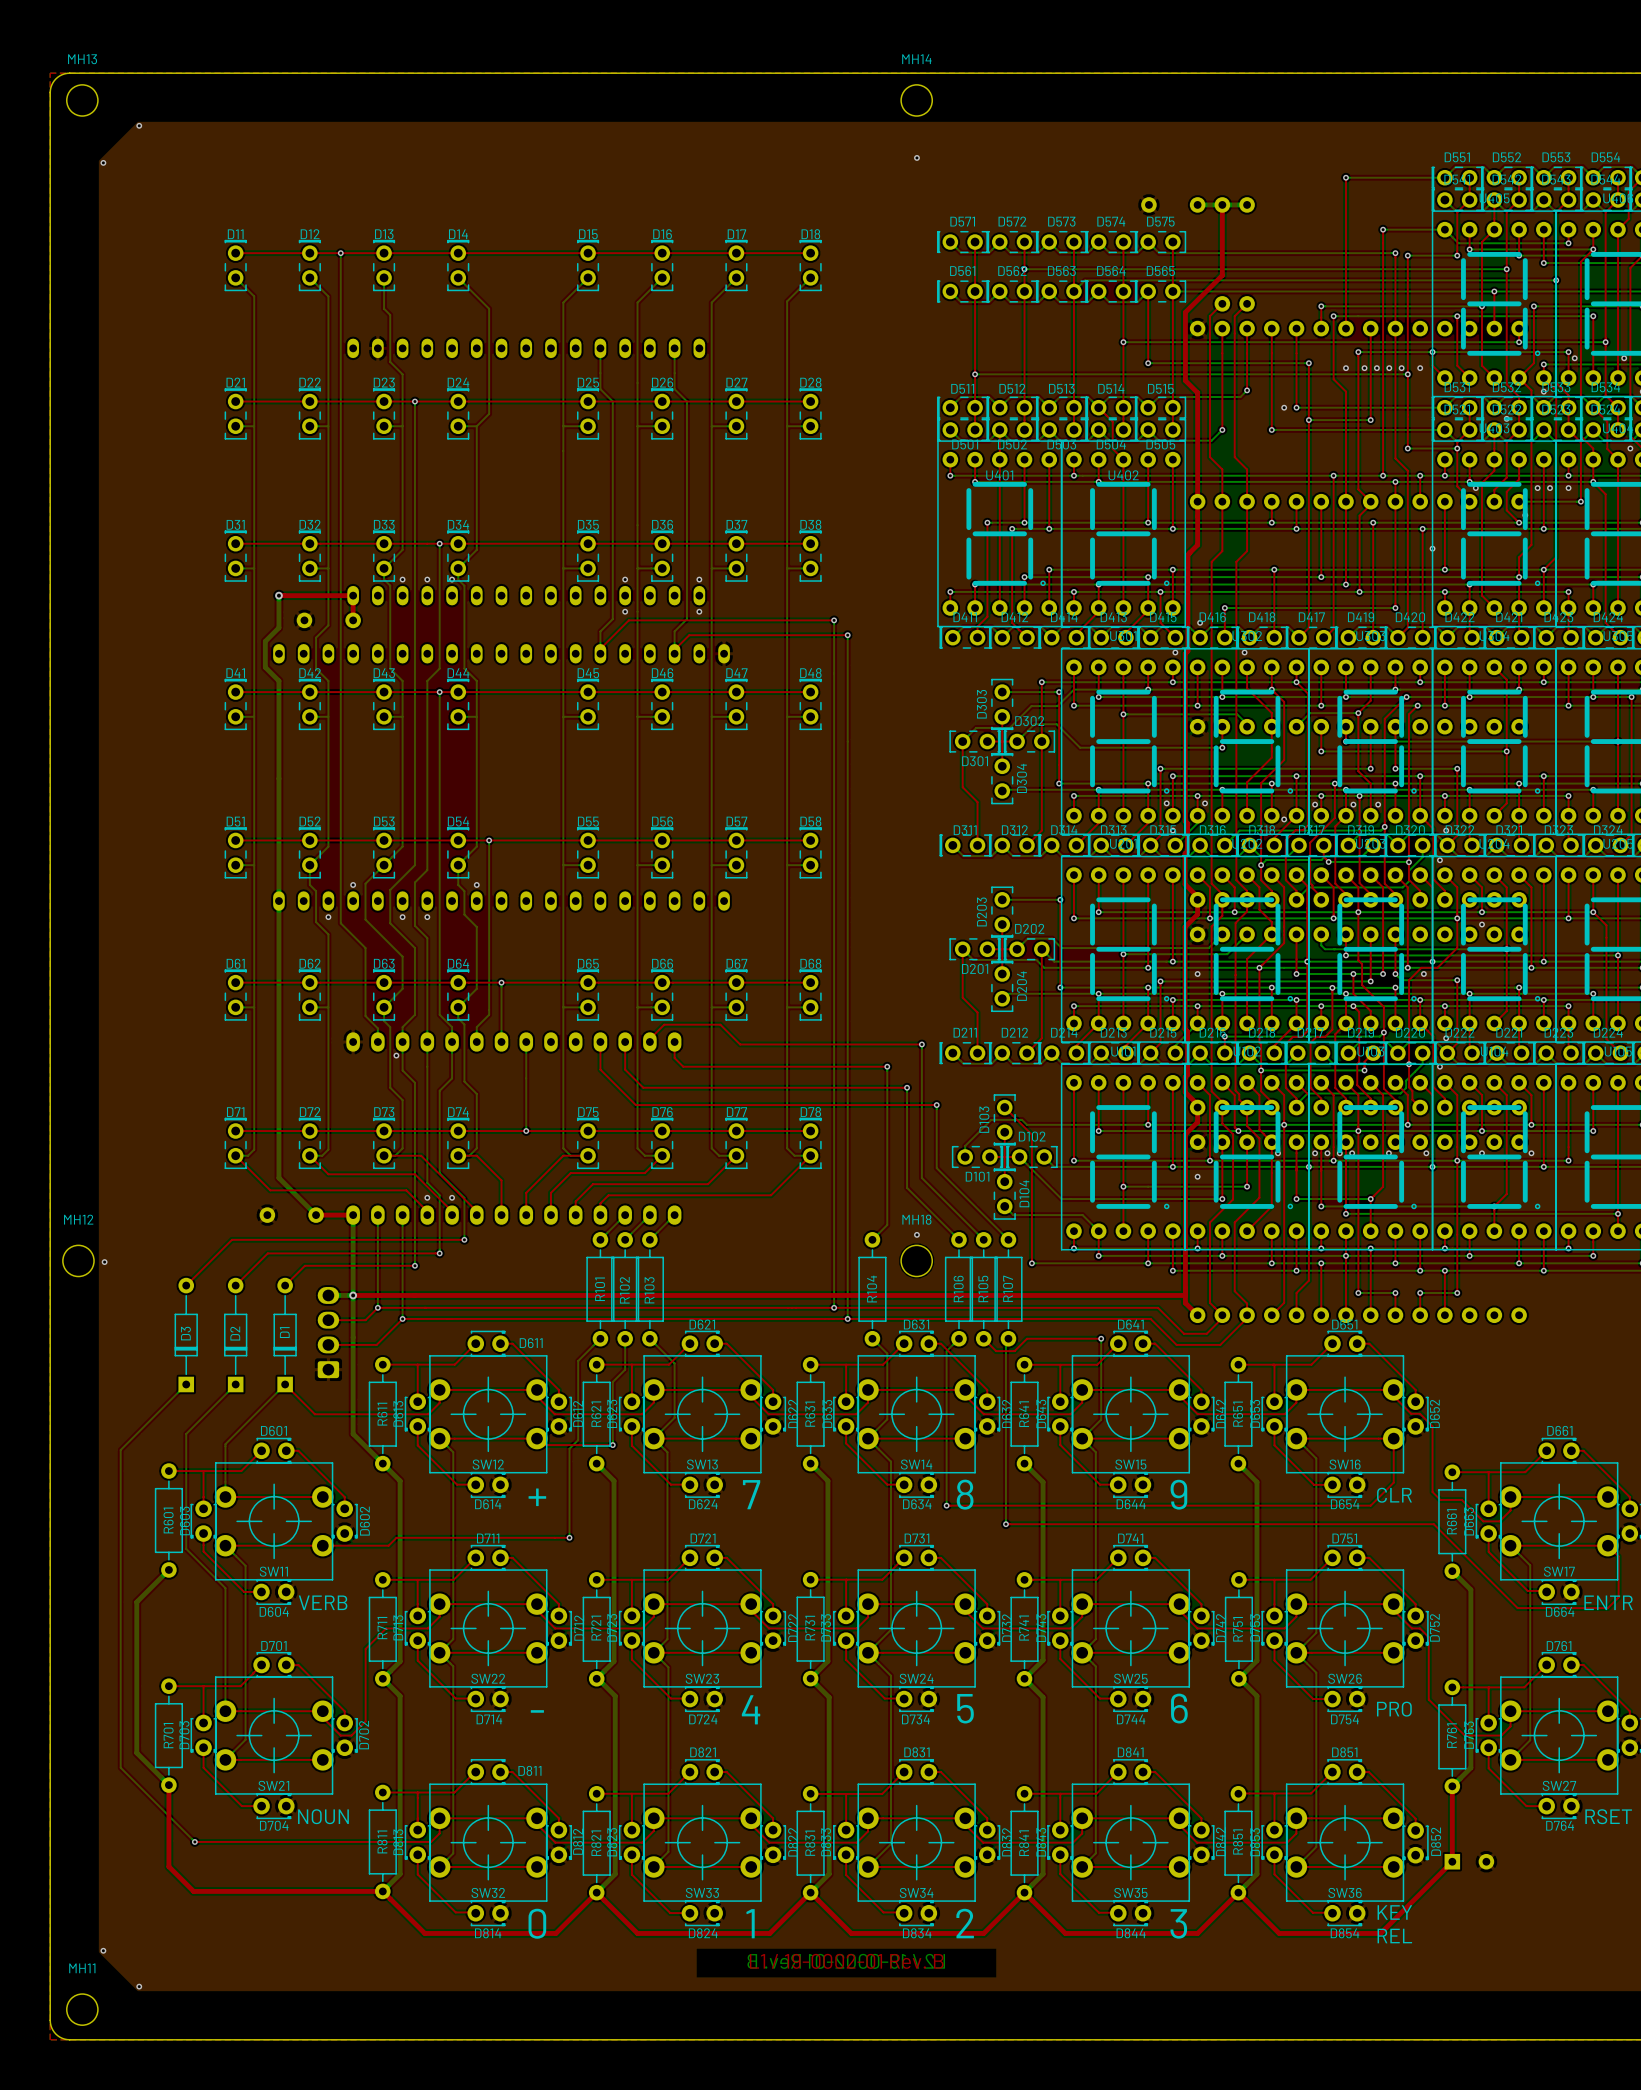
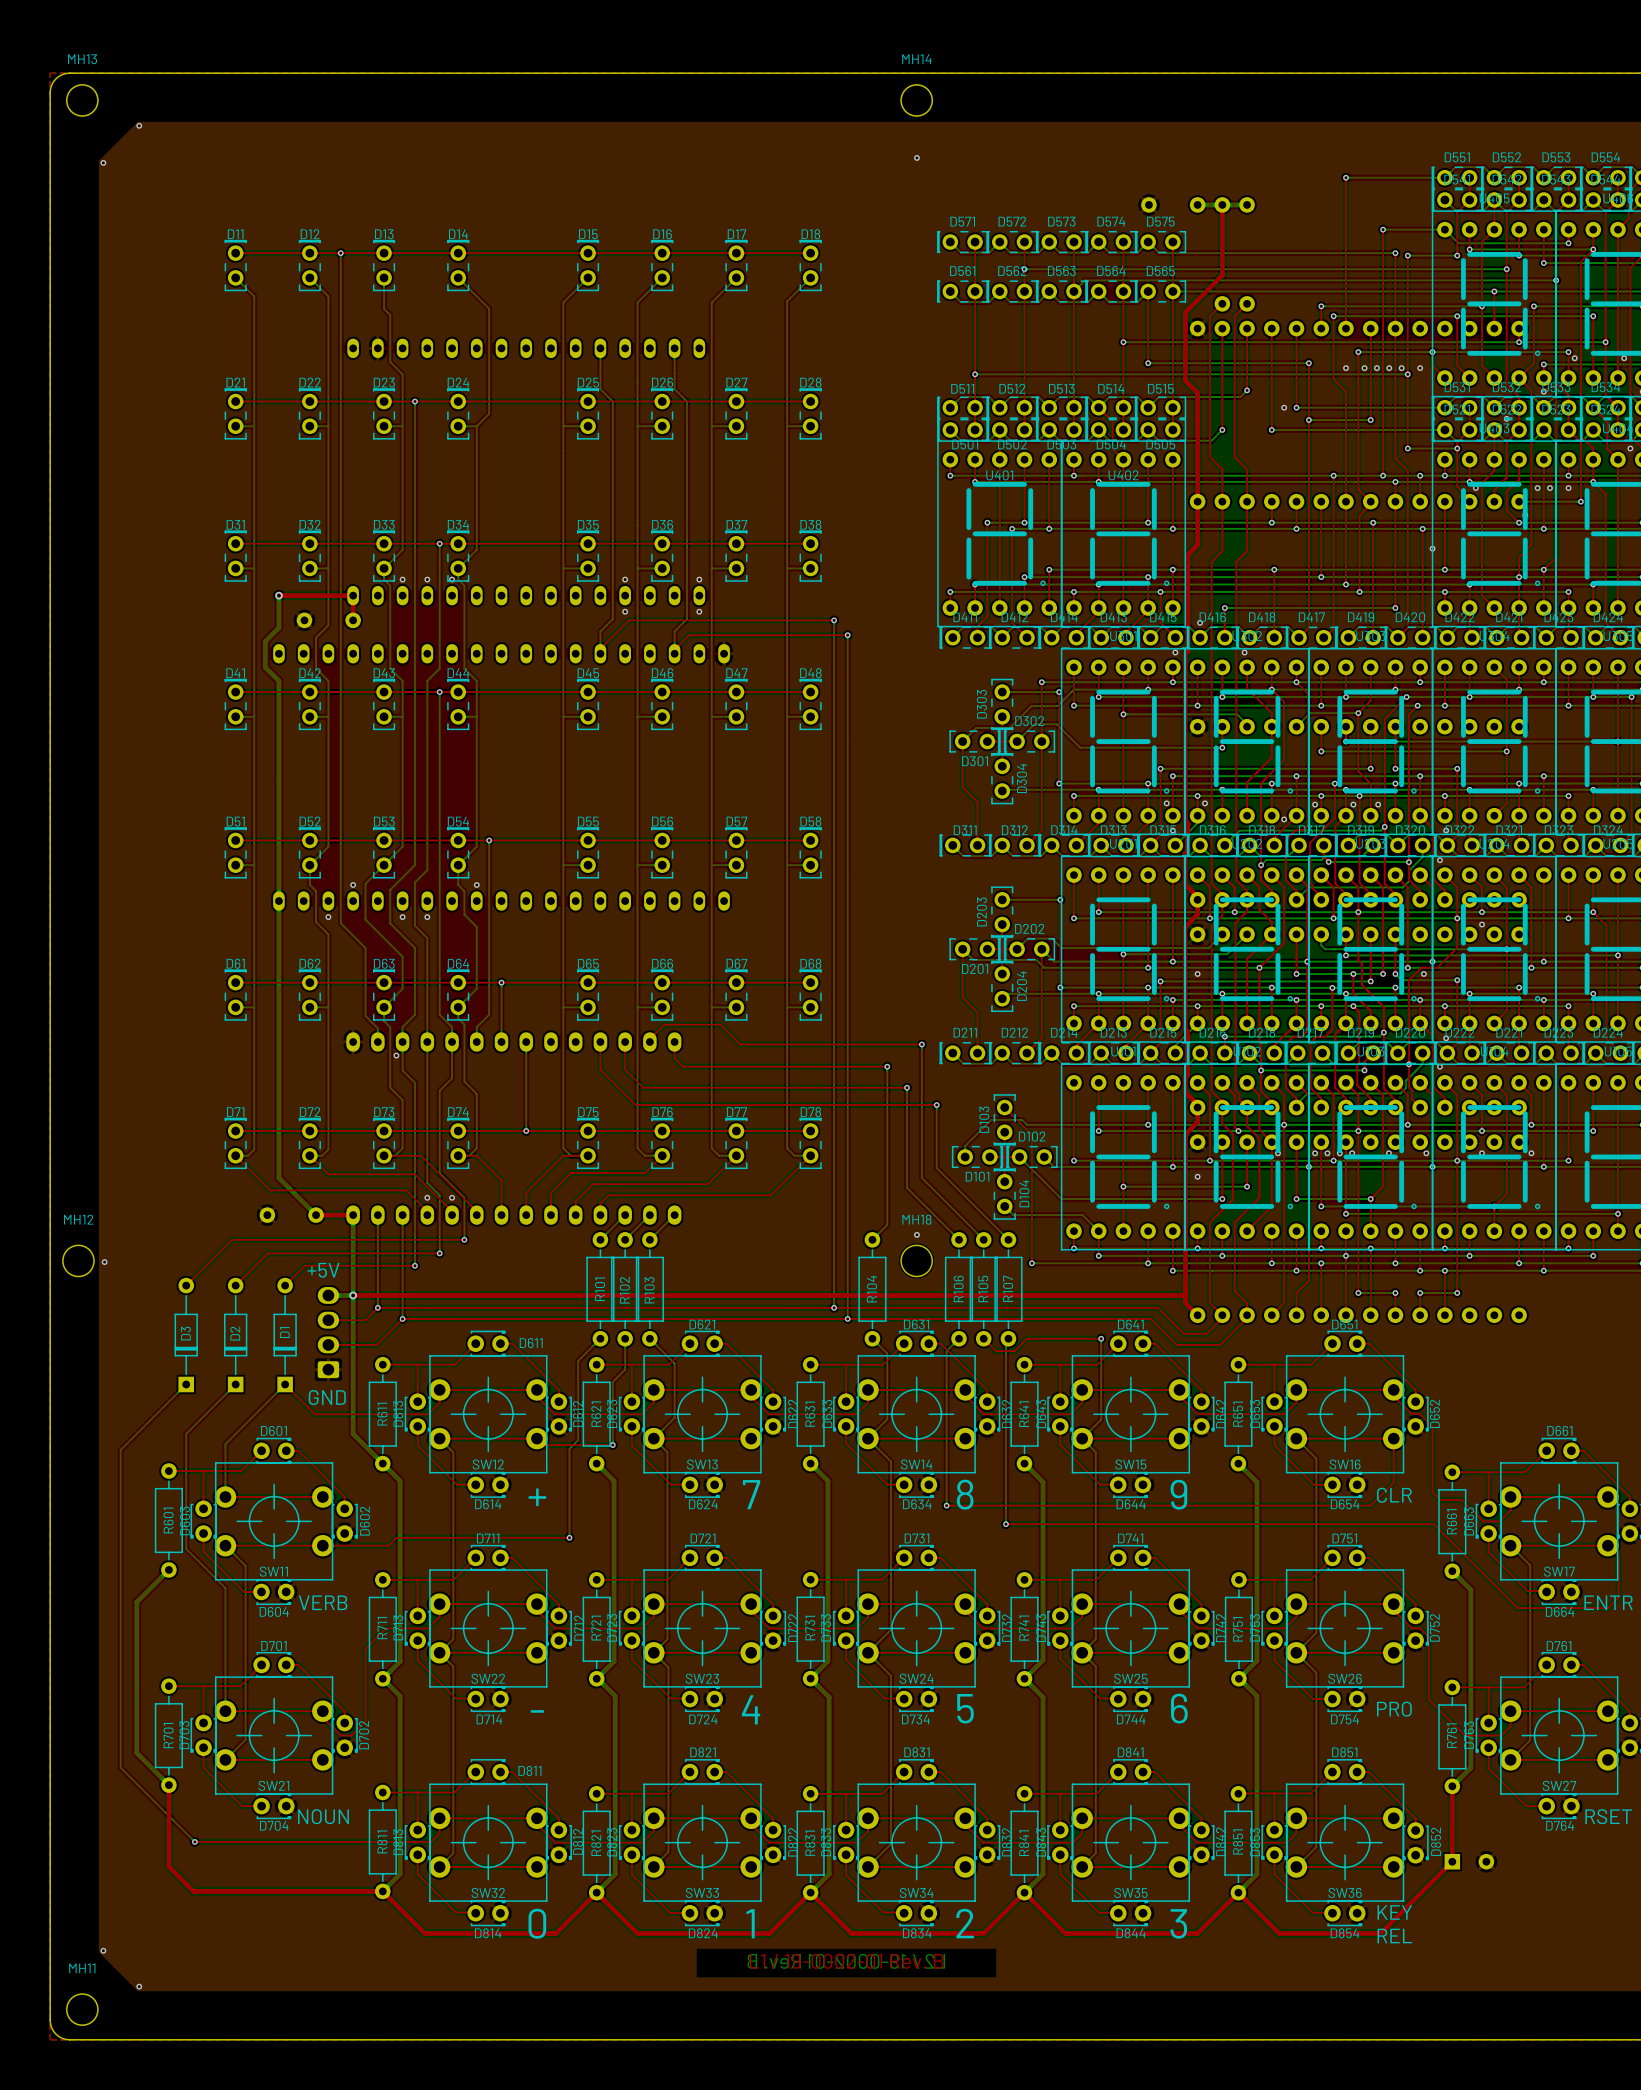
text: none -> +5V (323, 1270)
text: none -> GND (327, 1397)

